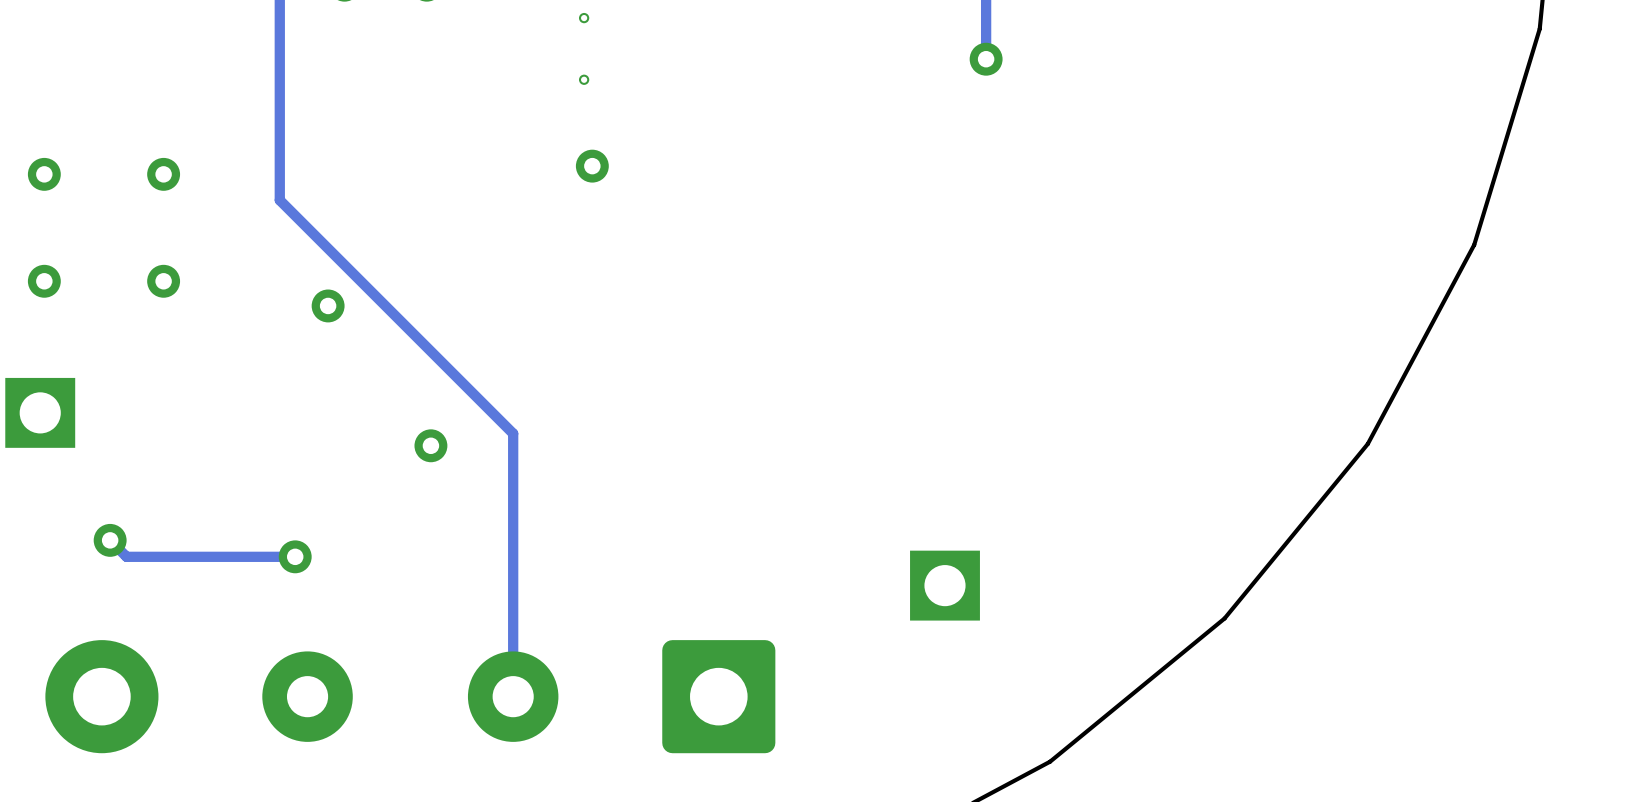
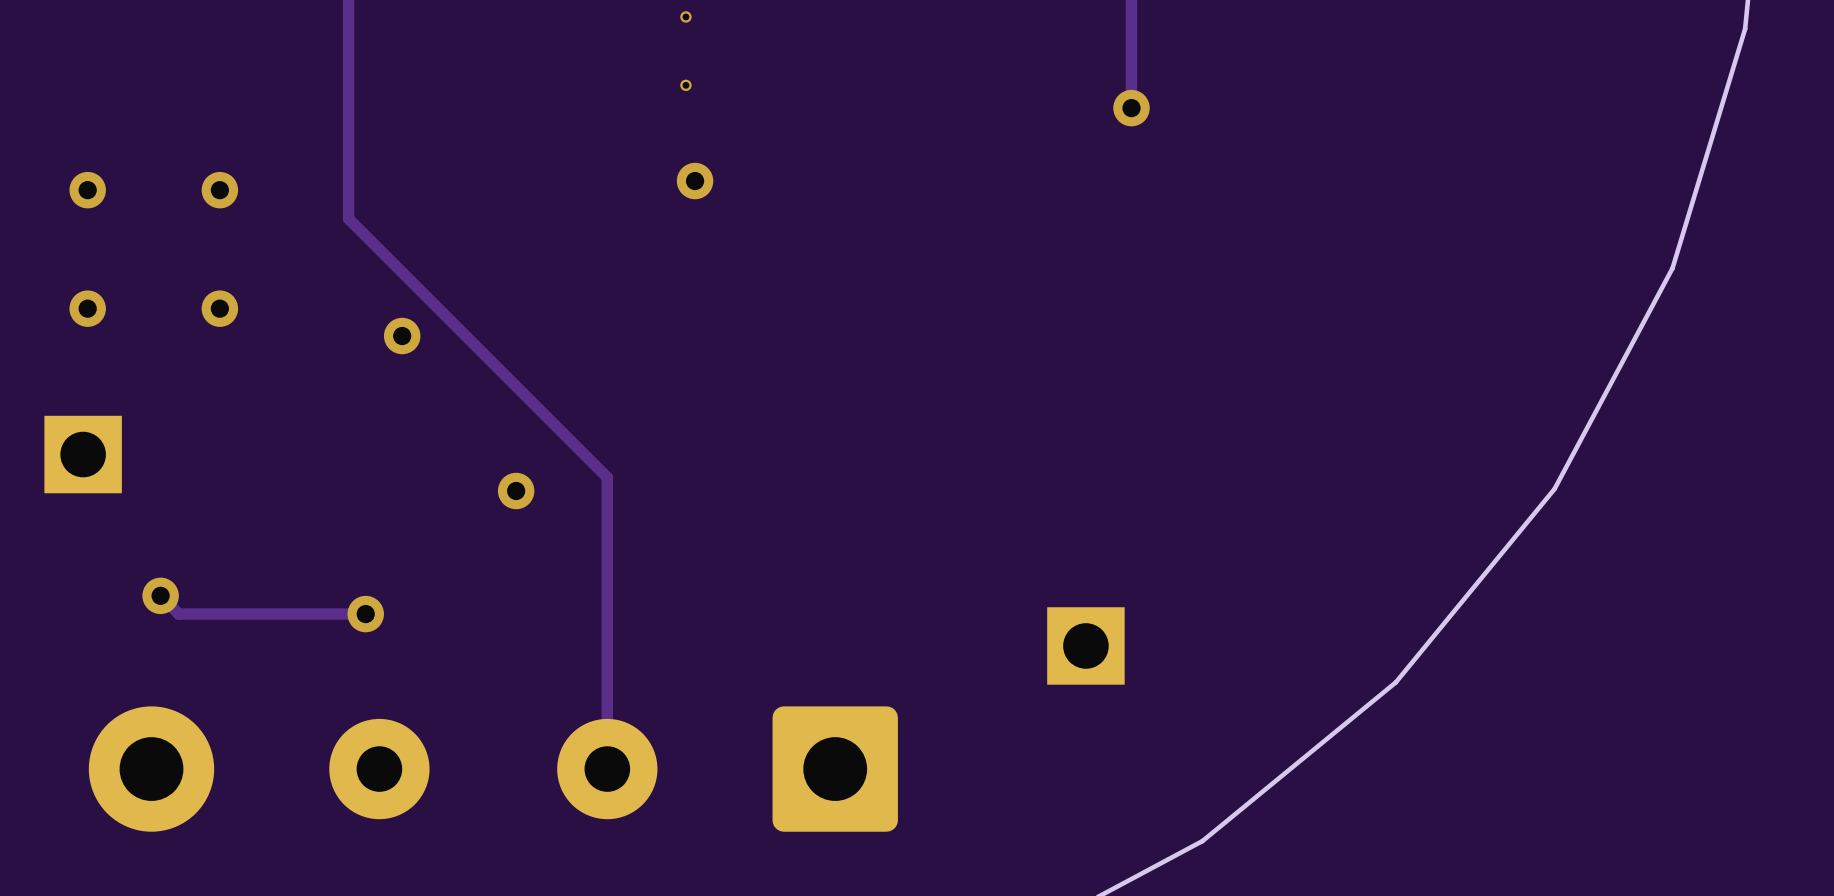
track: none -> (1131, 62) (1131, 108)
via position: (986, 59) -> (1131, 108)

